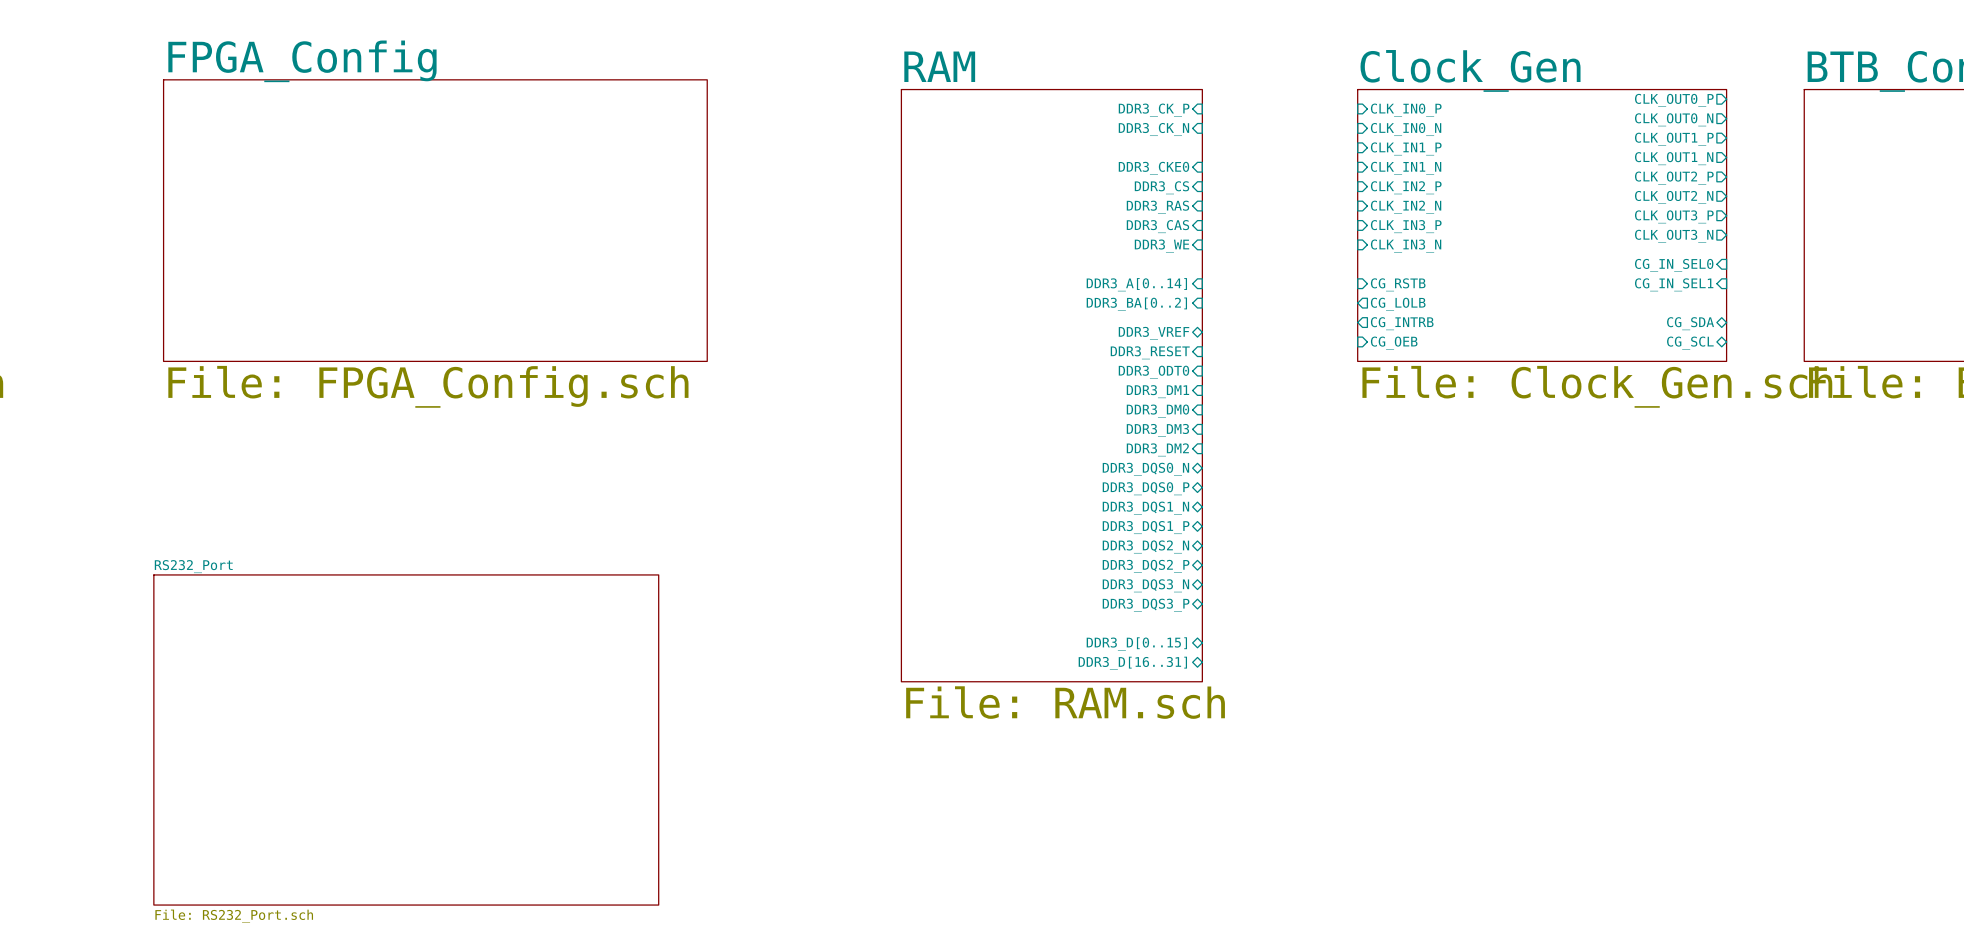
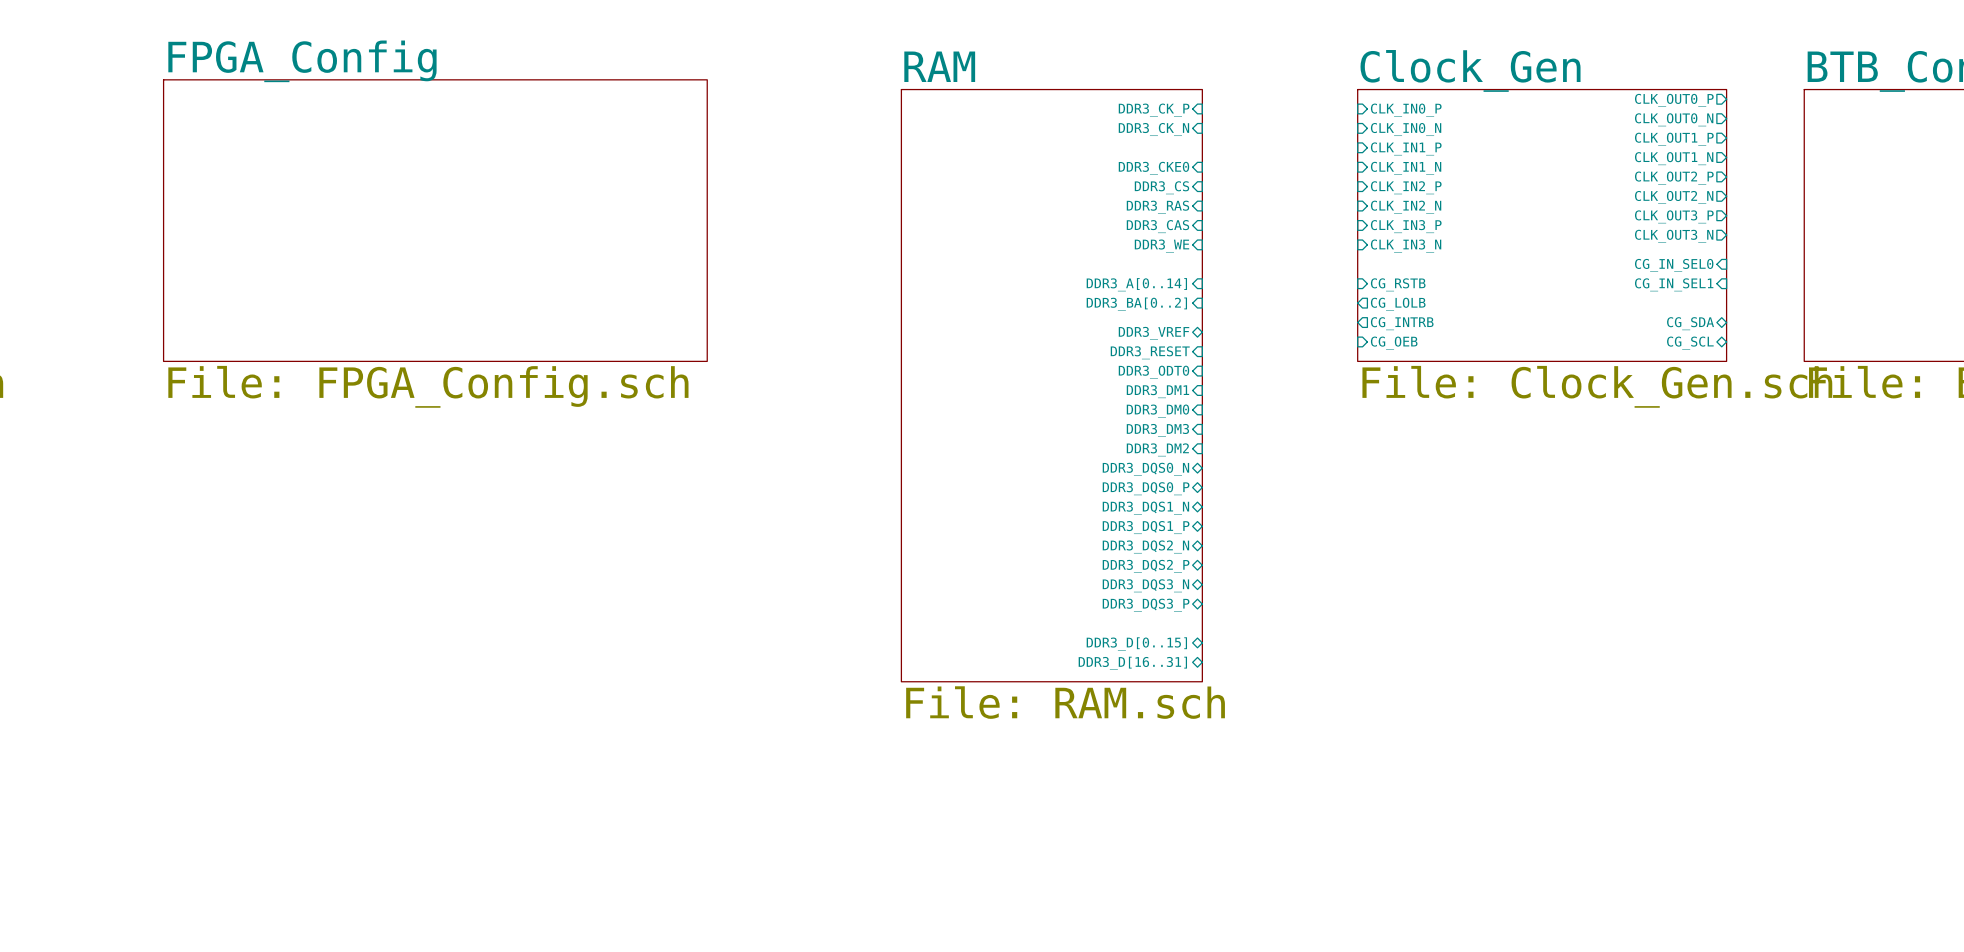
sheet RS232_Port: File: RS232_Port.sch (406, 740) -> none

